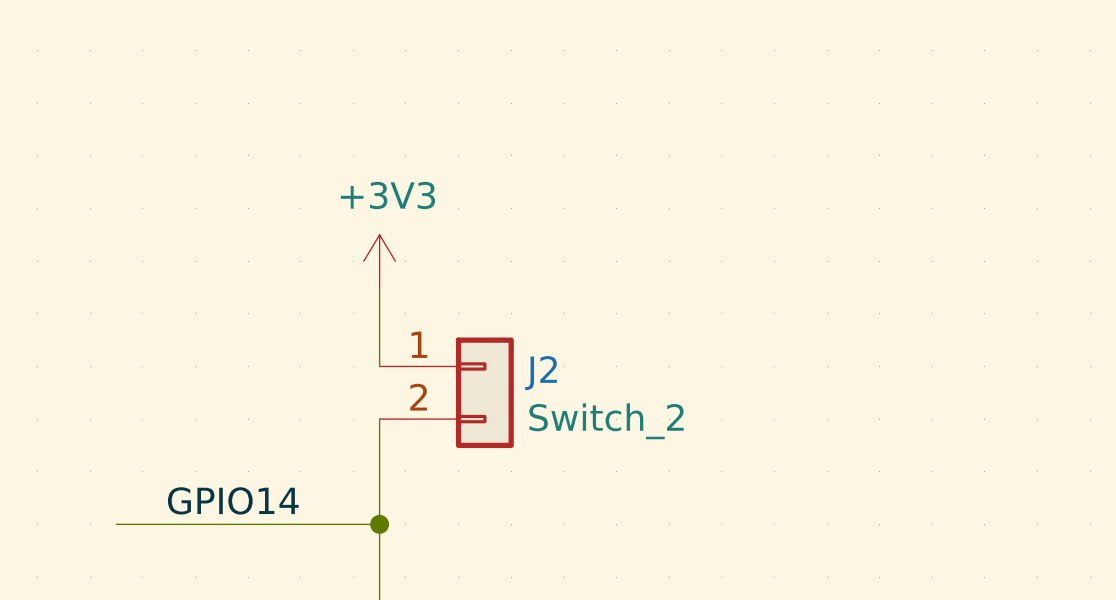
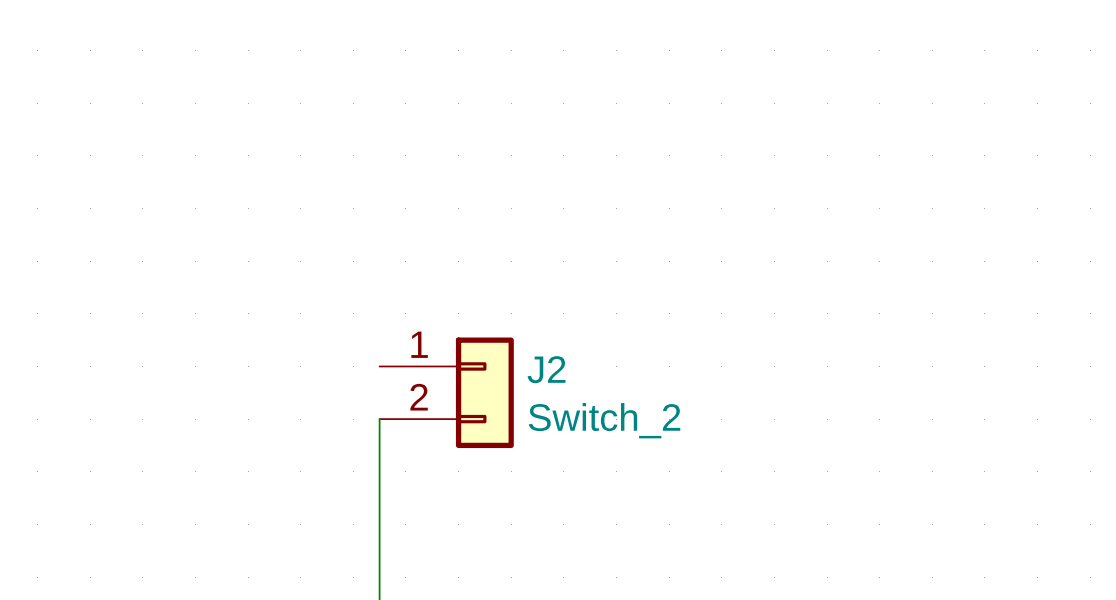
power symbol: +3V3 (379, 261) -> none
wire: (379, 287) (379, 366) -> none
label: GPIO14 (233, 500) -> none
wire: (116, 524) (379, 524) -> none
junction: (379, 524) -> none

